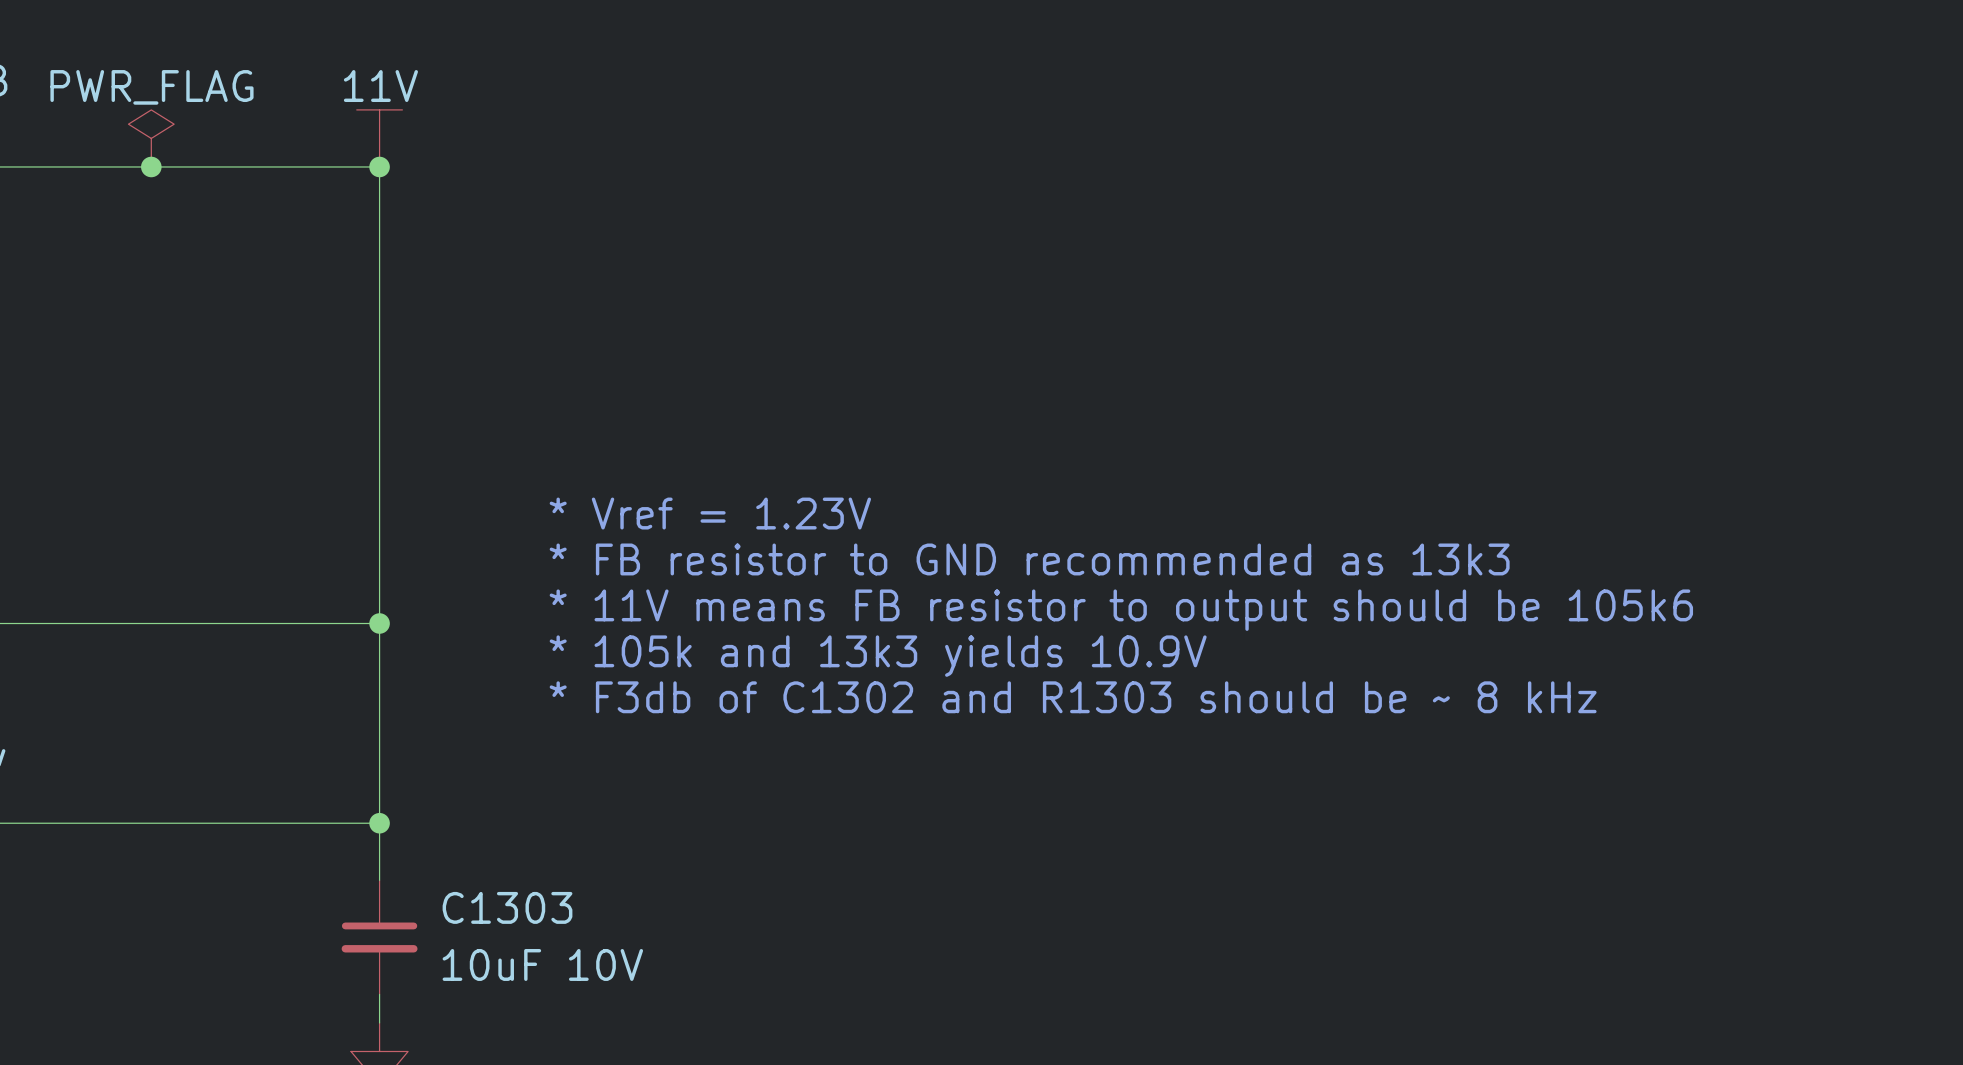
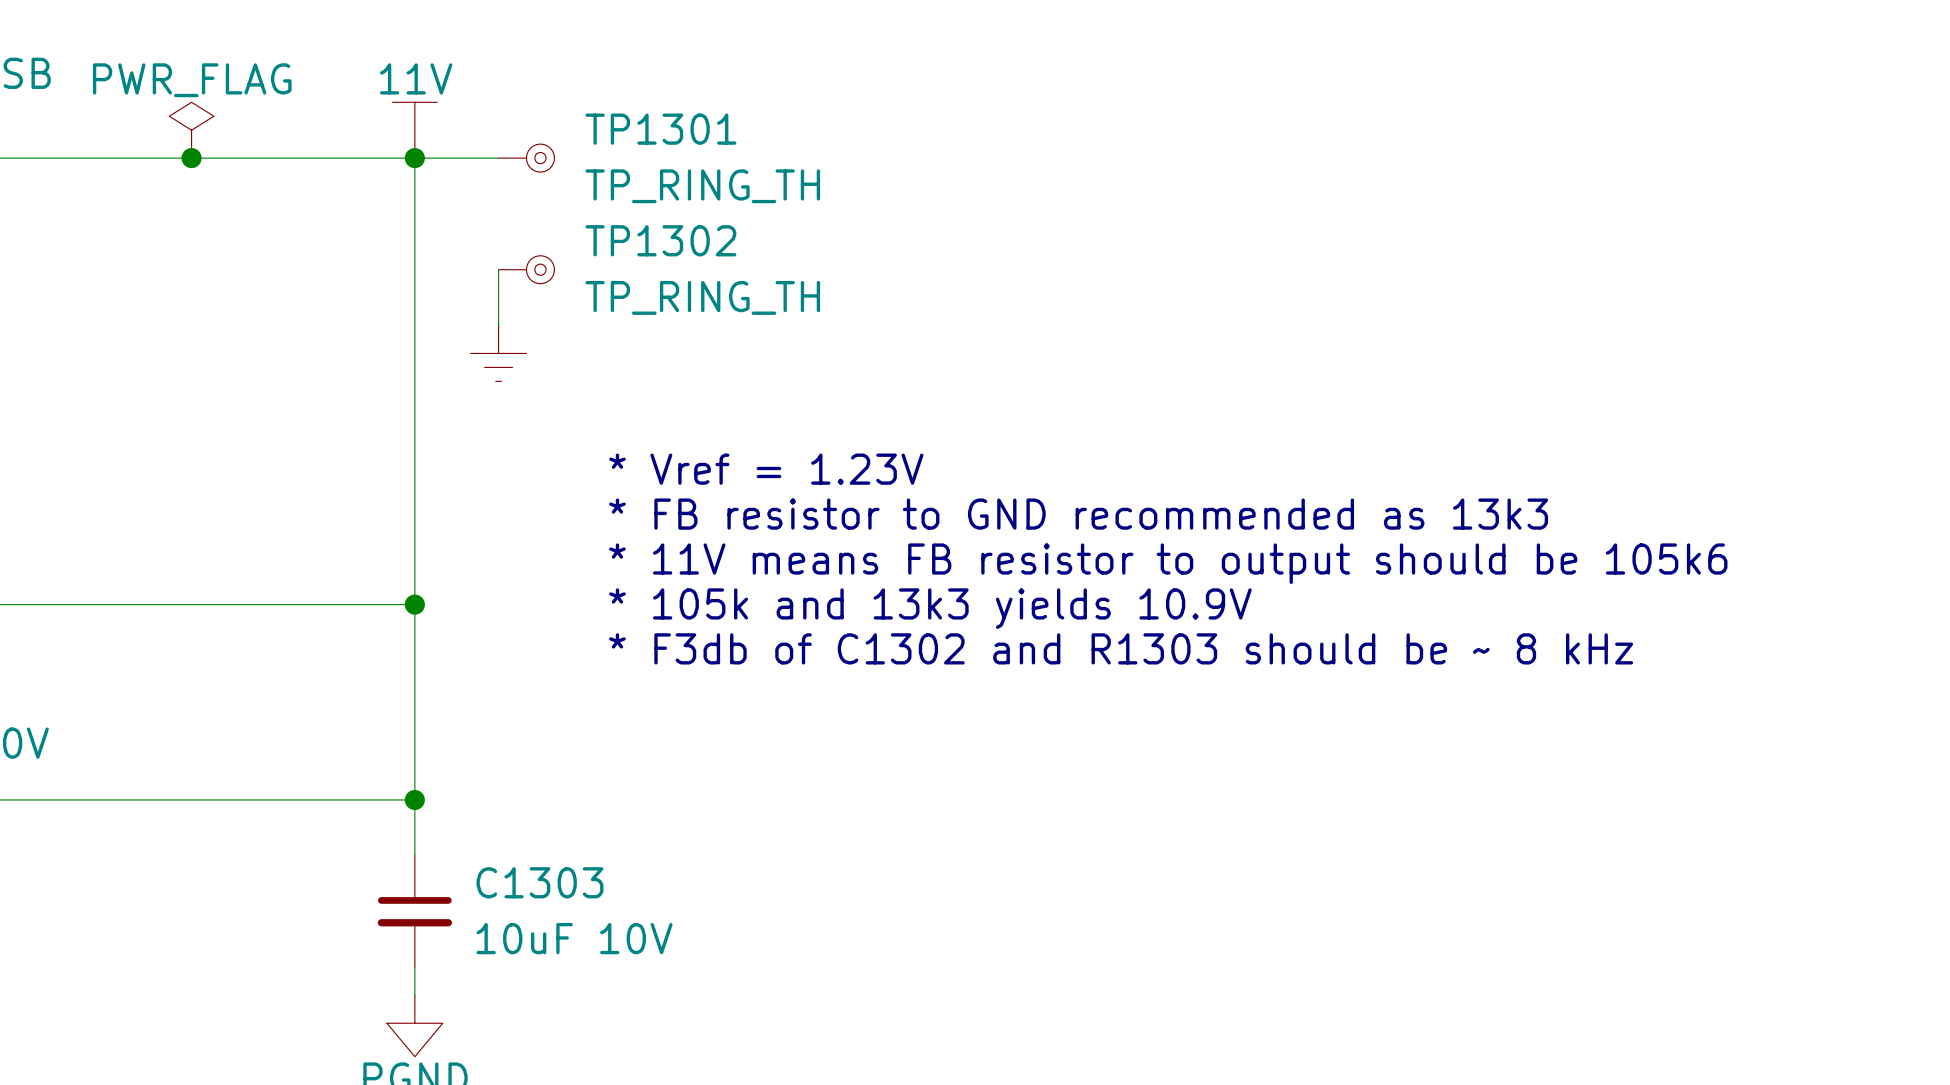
wire: none -> (414, 158) (498, 158)
TP1301: none -> TP_RING_TH (526, 158)
wire: none -> (498, 269) (498, 325)
TP1302: none -> TP_RING_TH (526, 269)
power symbol: none -> (498, 353)
text position: * Vref = 1.23V (710, 513) -> * Vref = 1.23V (766, 469)
text position: * FB resistor to GND recommended as 13k3 (1029, 559) -> * FB resistor to GND recommended as 13k3 (1078, 514)
text position: * 11V means FB resistor to output should be 105k6 (1121, 610) -> * 11V means FB resistor to output should be 105k6 (1168, 563)
text position: * 105k and 13k3 yields 10.9V (878, 656) -> * 105k and 13k3 yields 10.9V (930, 608)
text position: * F3db of C1302 and R1303 should be ~ 8 kHz (1073, 697) -> * F3db of C1302 and R1303 should be ~ 8 kHz (1121, 648)

